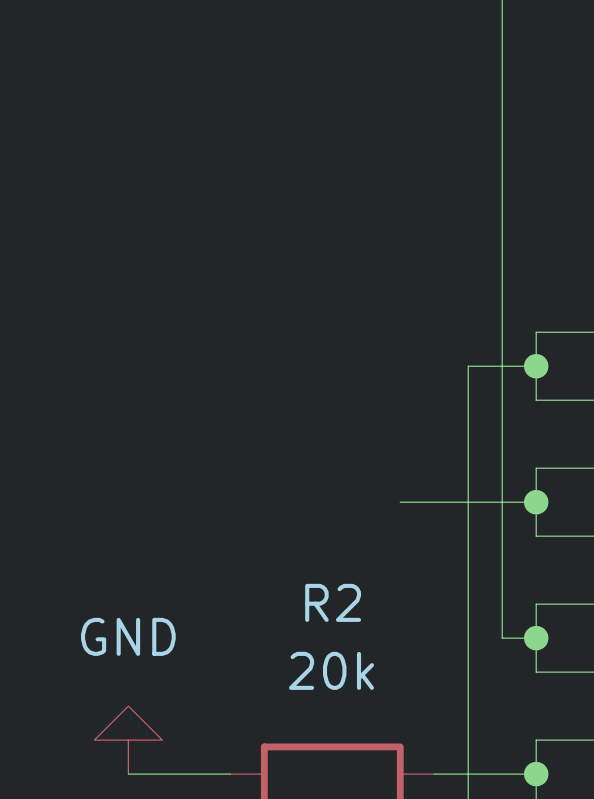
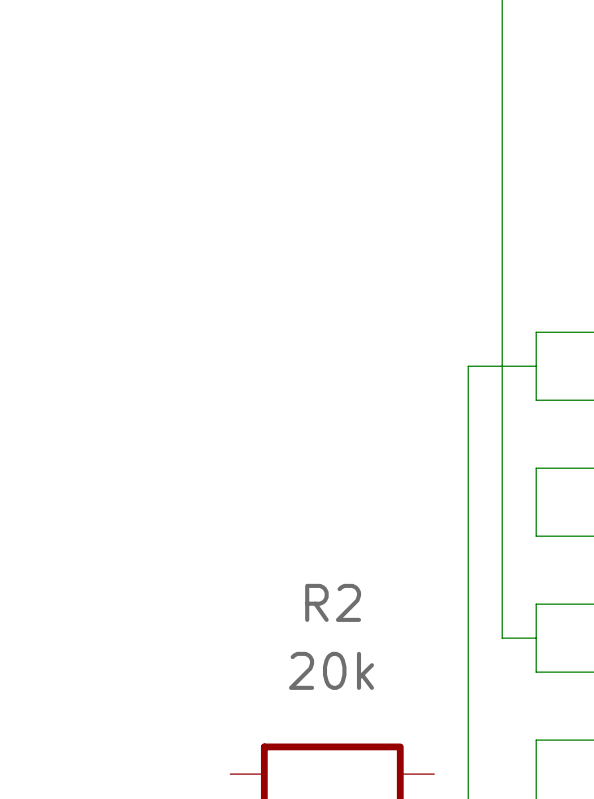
junction: (536, 366) -> none
wire: (400, 502) (536, 502) -> none
junction: (536, 502) -> none
junction: (536, 638) -> none
power symbol: GND (128, 740) -> none
wire: (128, 774) (230, 774) -> none
wire: (434, 774) (536, 774) -> none
junction: (536, 774) -> none

